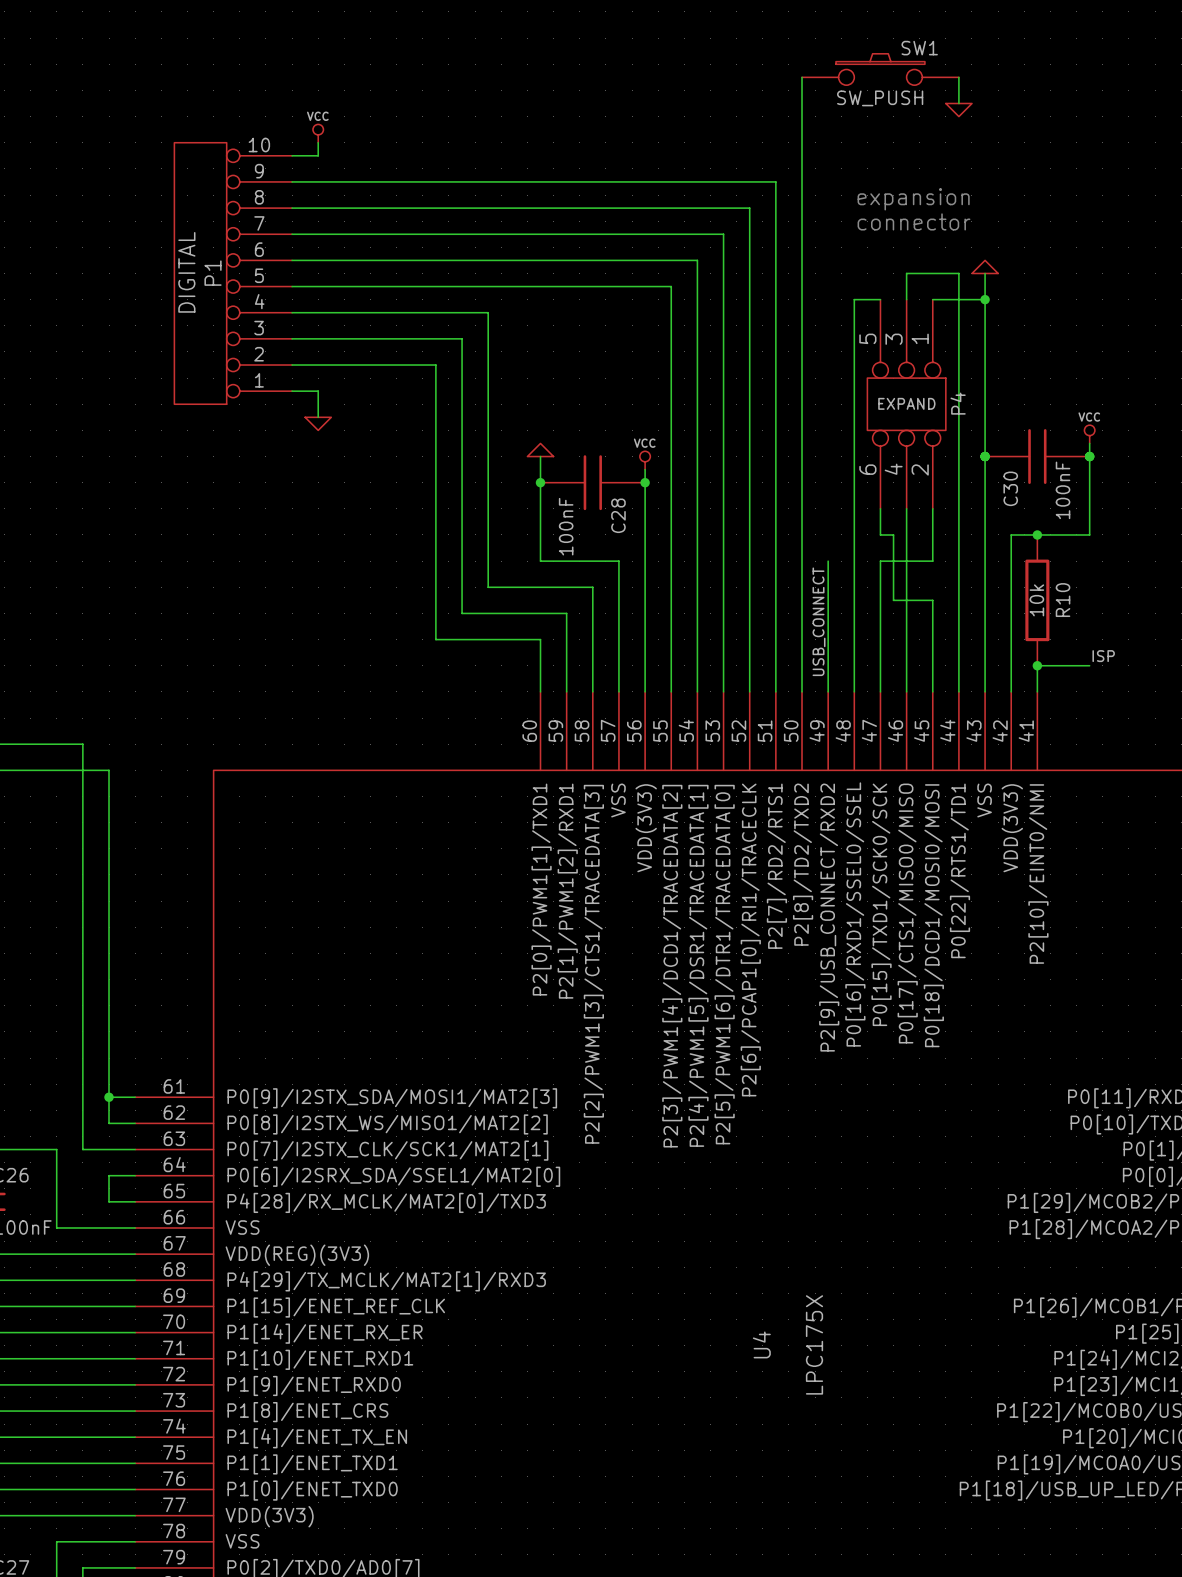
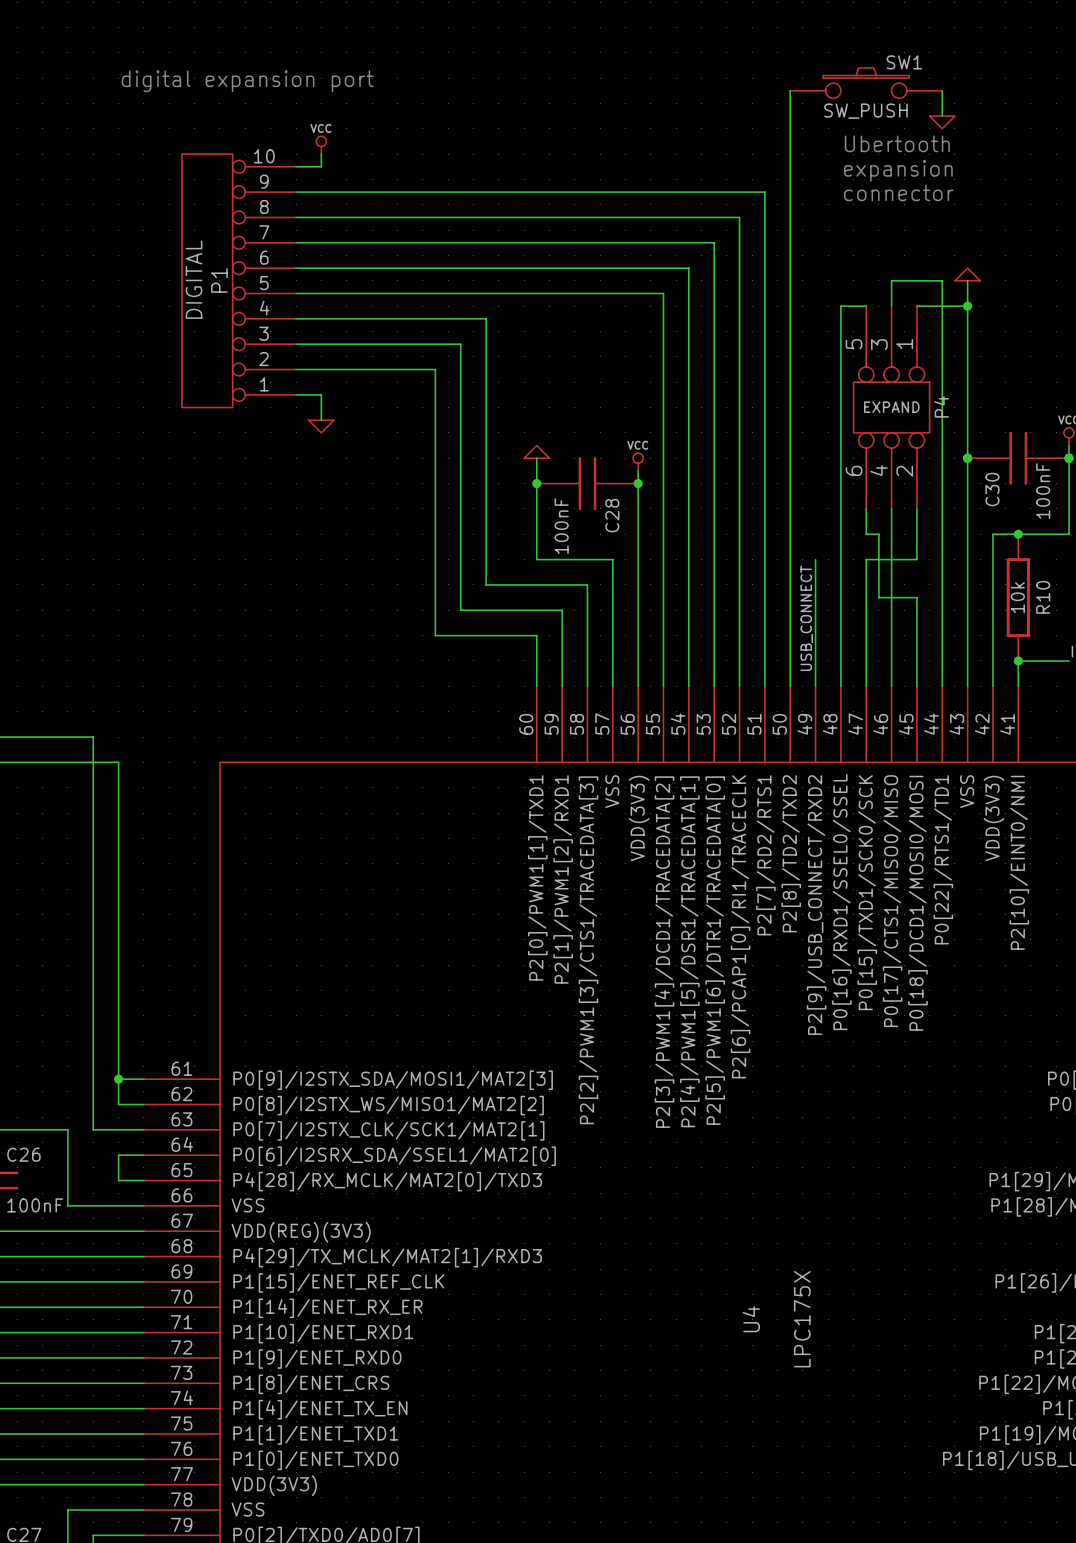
text: none -> digital expansion port (247, 81)
text: none -> Ubertooth (897, 143)
text position: expansion (913, 199) -> expansion (898, 170)
text position: connector (914, 221) -> connector (898, 192)

